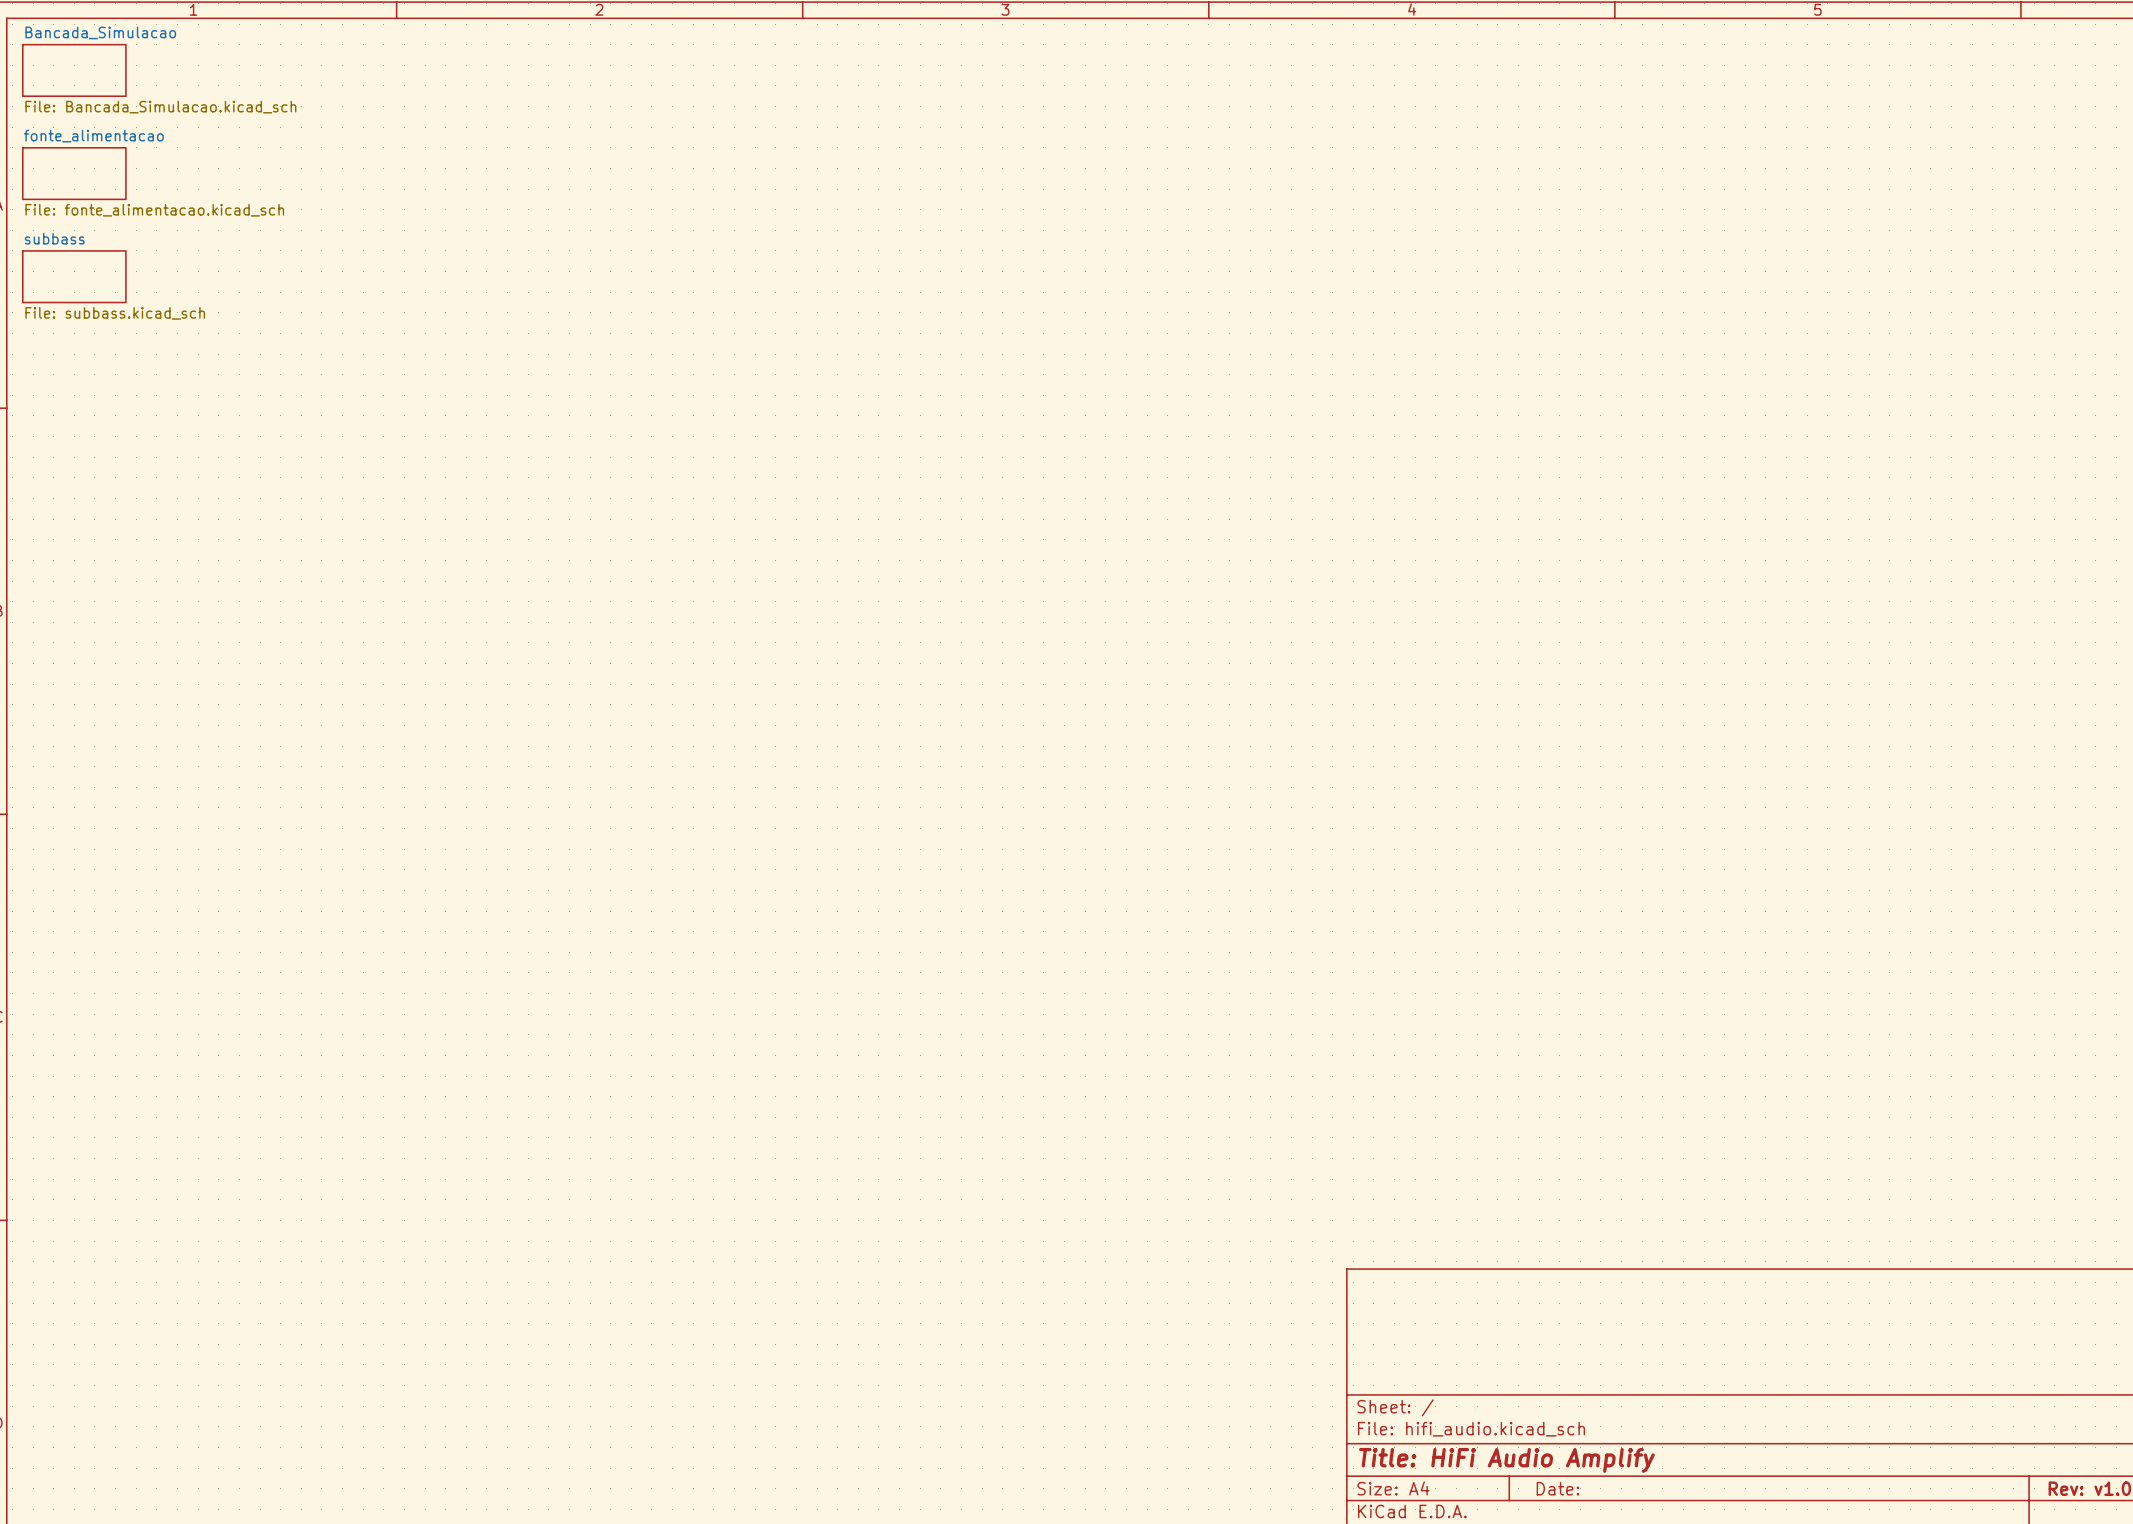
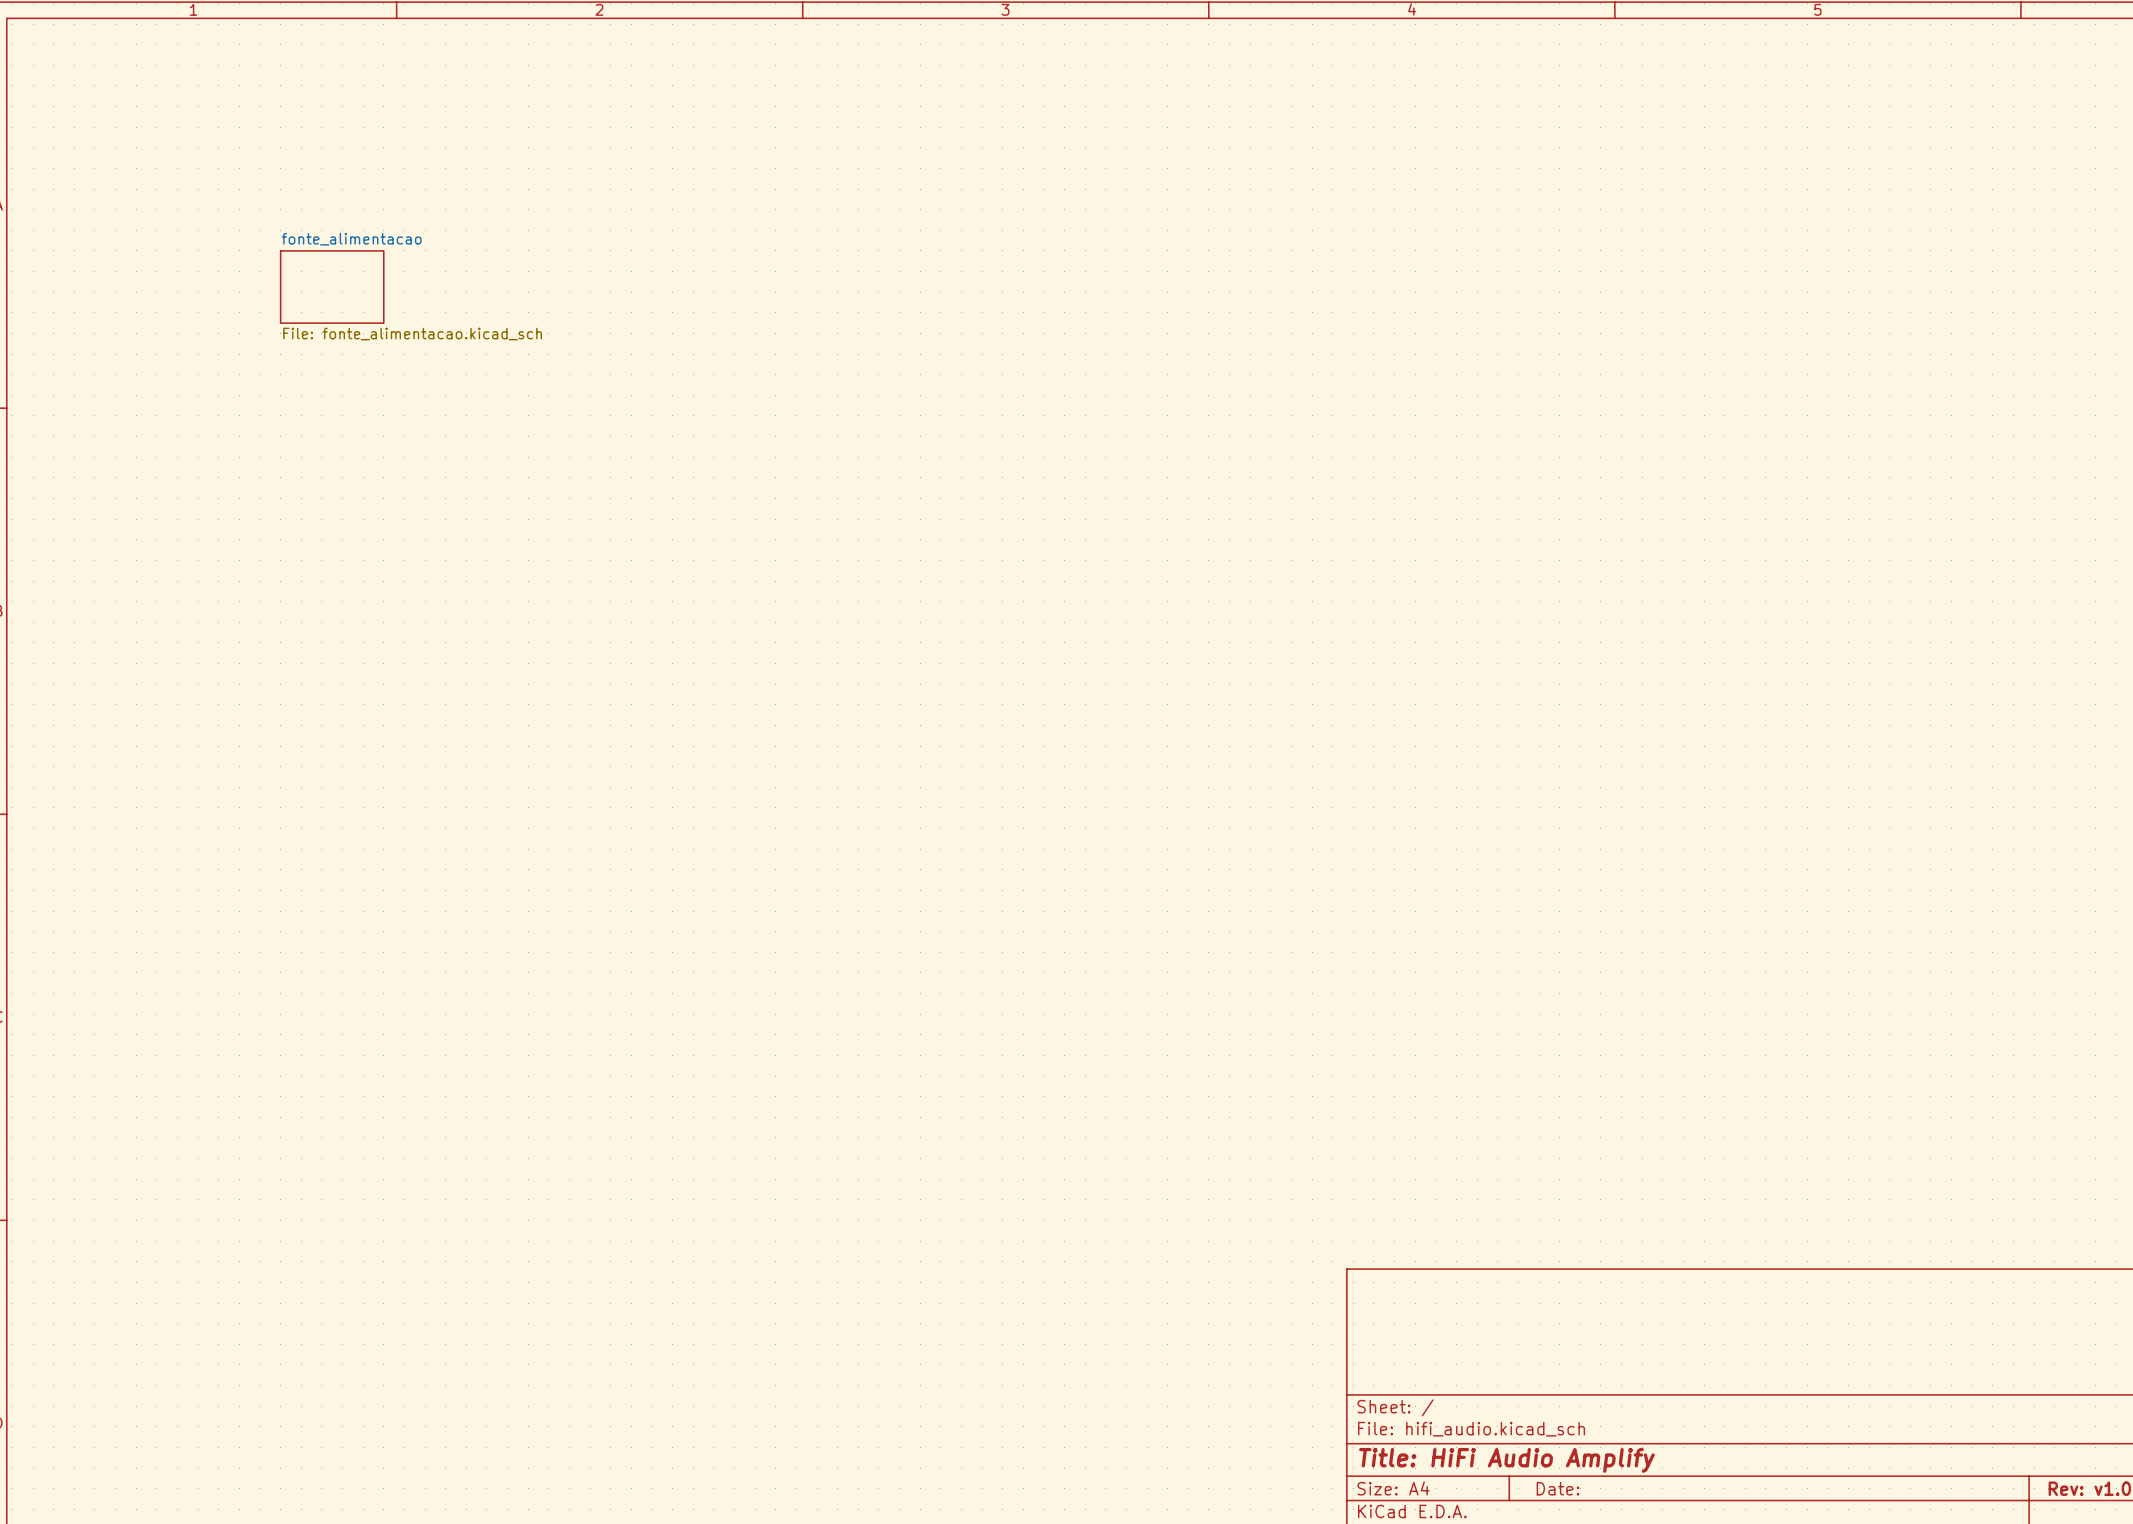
sheet Bancada_Simulacao: File: Bancada_Simulacao.kicad_sch (74, 70) -> none
sheet fonte_alimentacao: File: fonte_alimentacao.kicad_sch (74, 173) -> none
sheet subbass: File: subbass.kicad_sch (74, 276) -> none
sheet fonte_alimentacao: none -> File: fonte_alimentacao.kicad_sch (332, 287)

